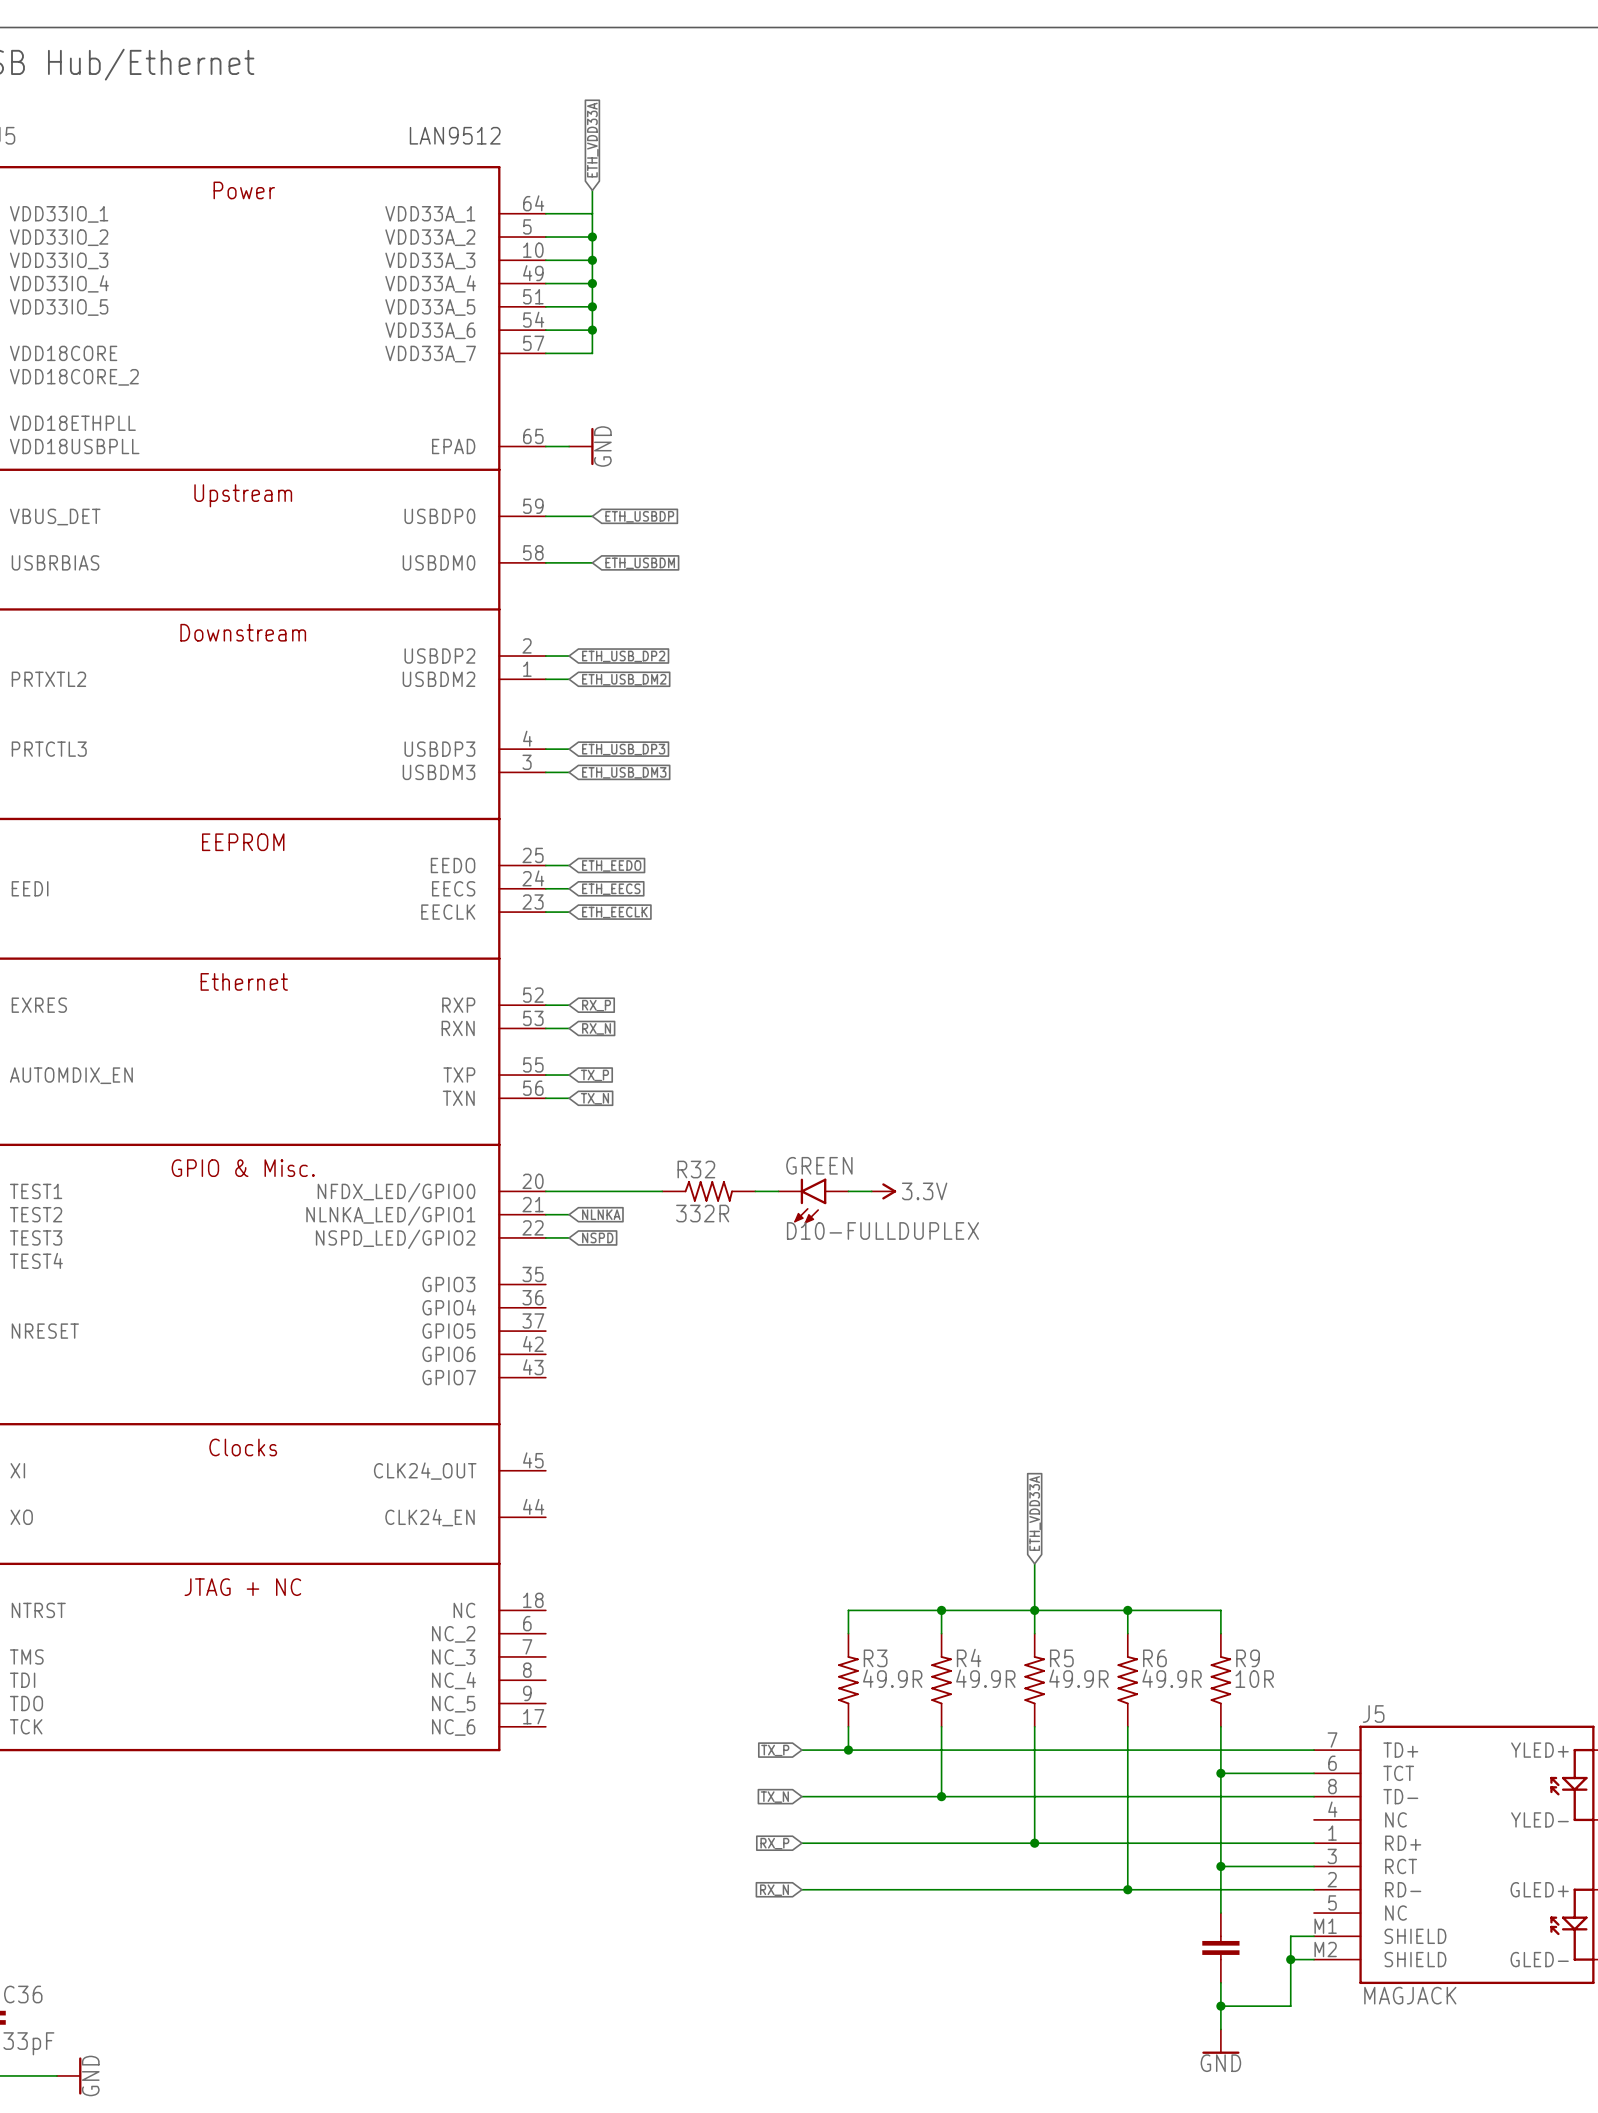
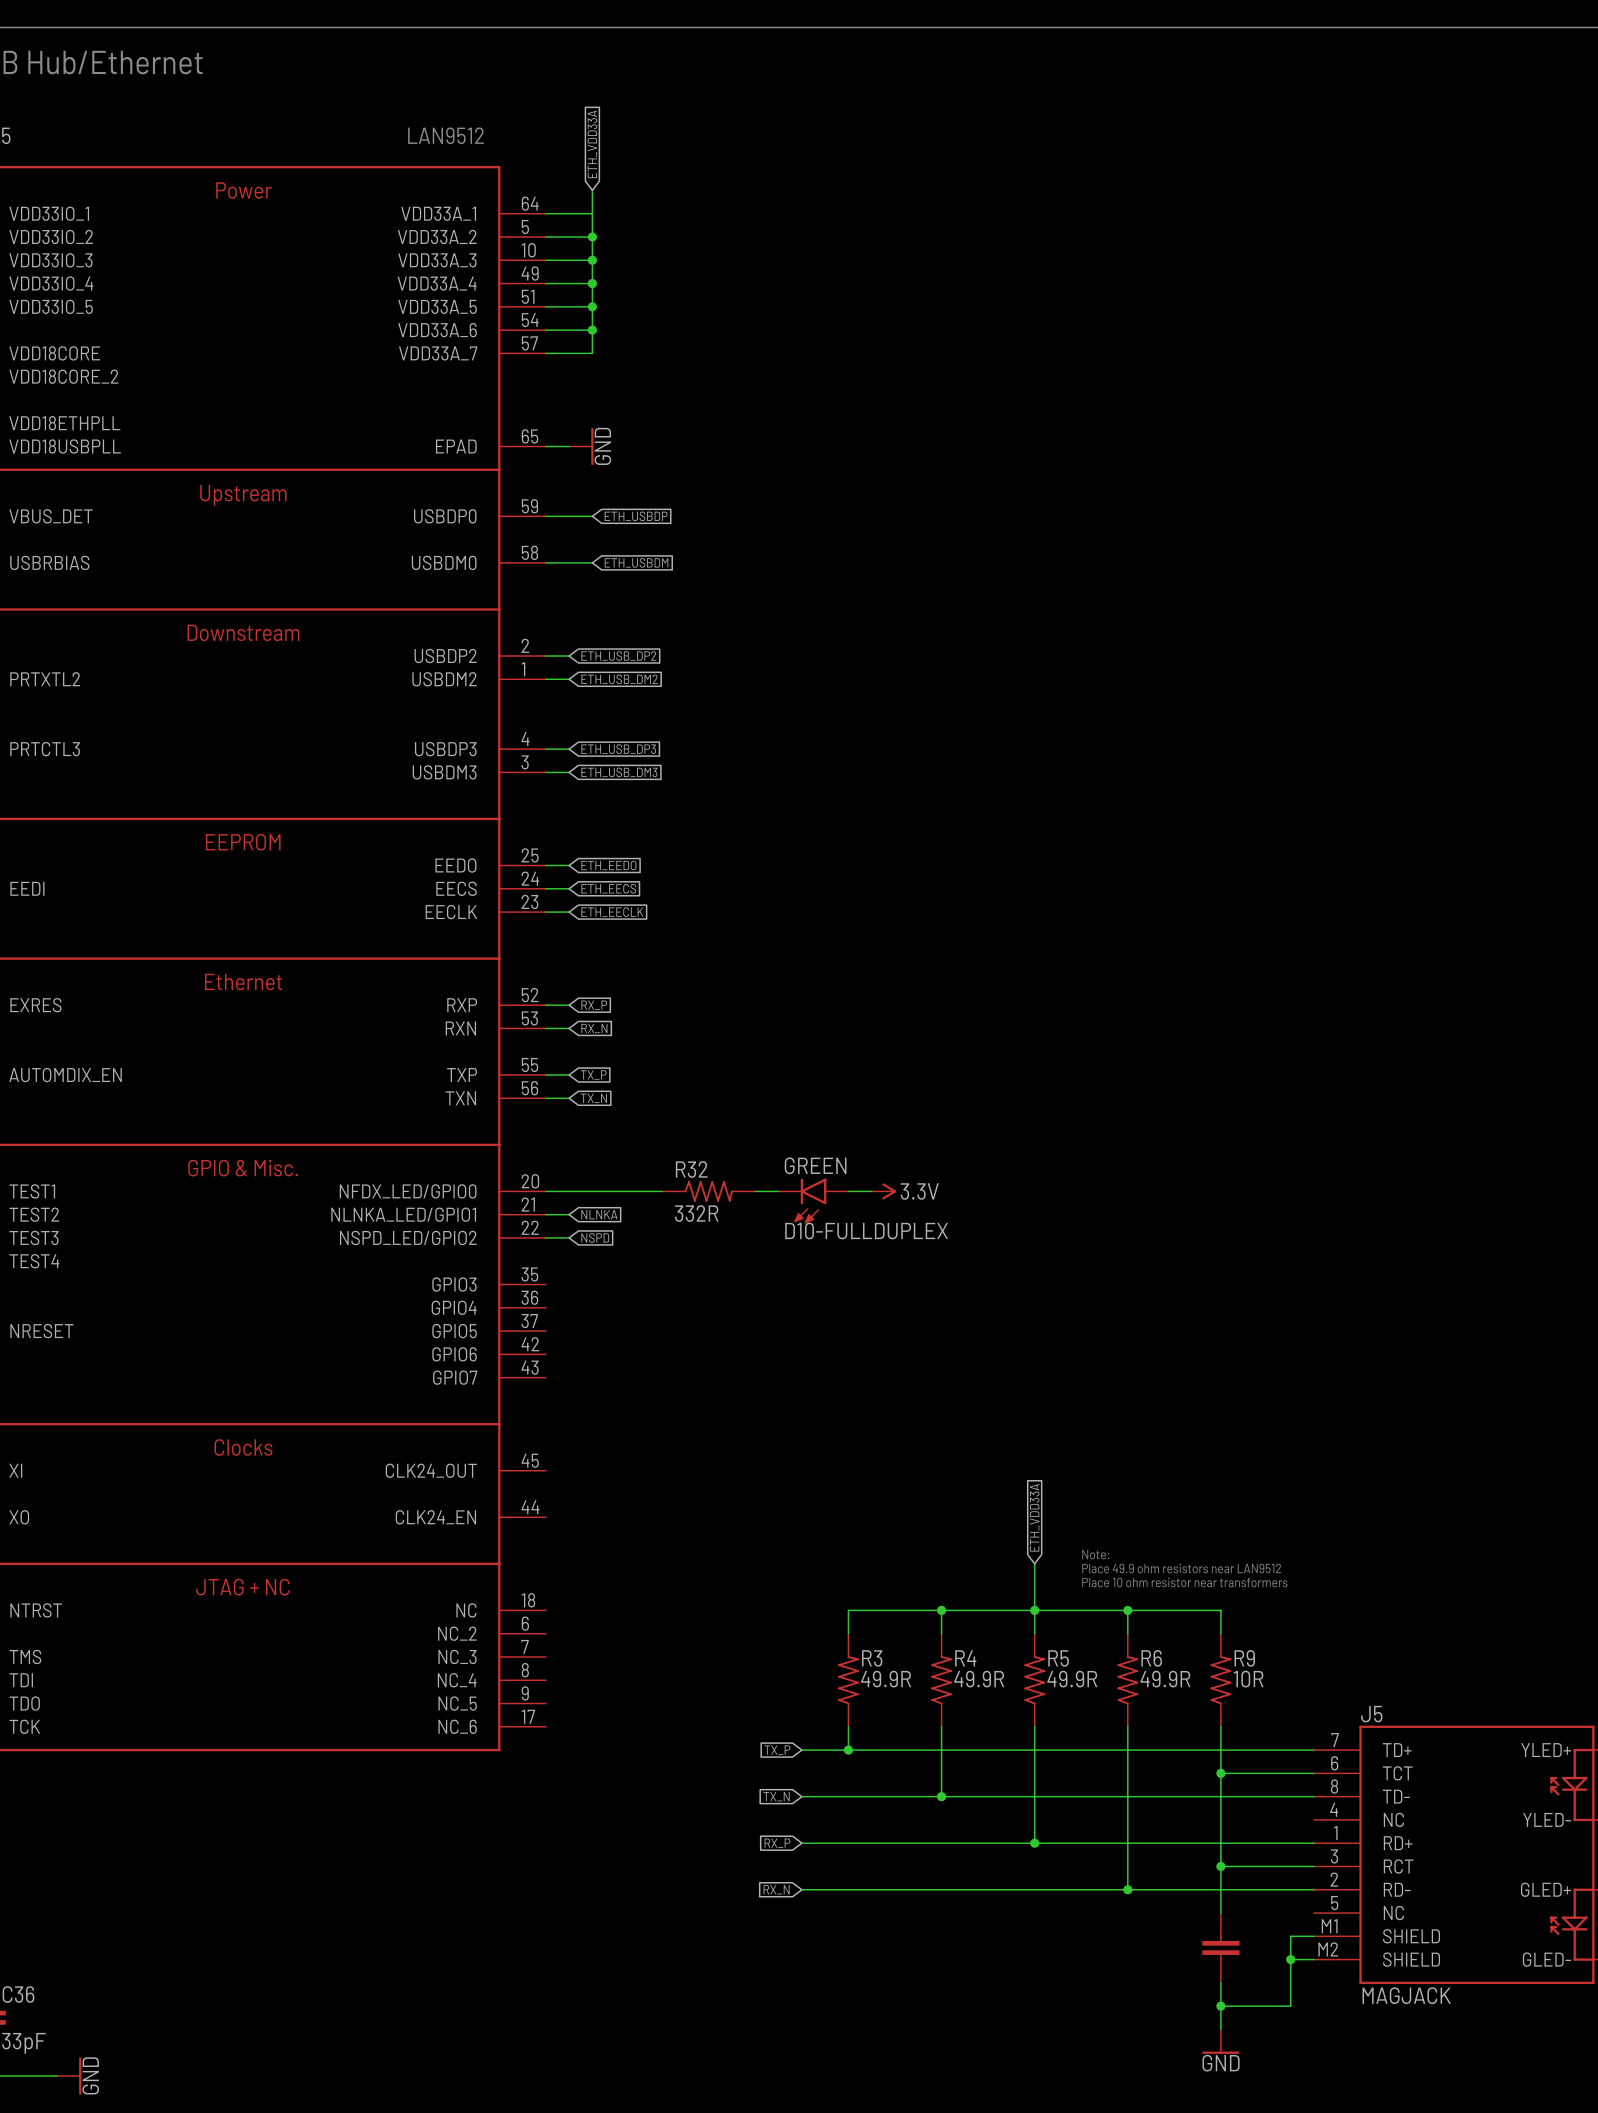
text: none -> Note: (1095, 1554)
text: none -> Place 49.9 ohm resistors near LAN9512 (1181, 1568)
text: none -> Place 10 ohm resistor near transformers (1184, 1582)

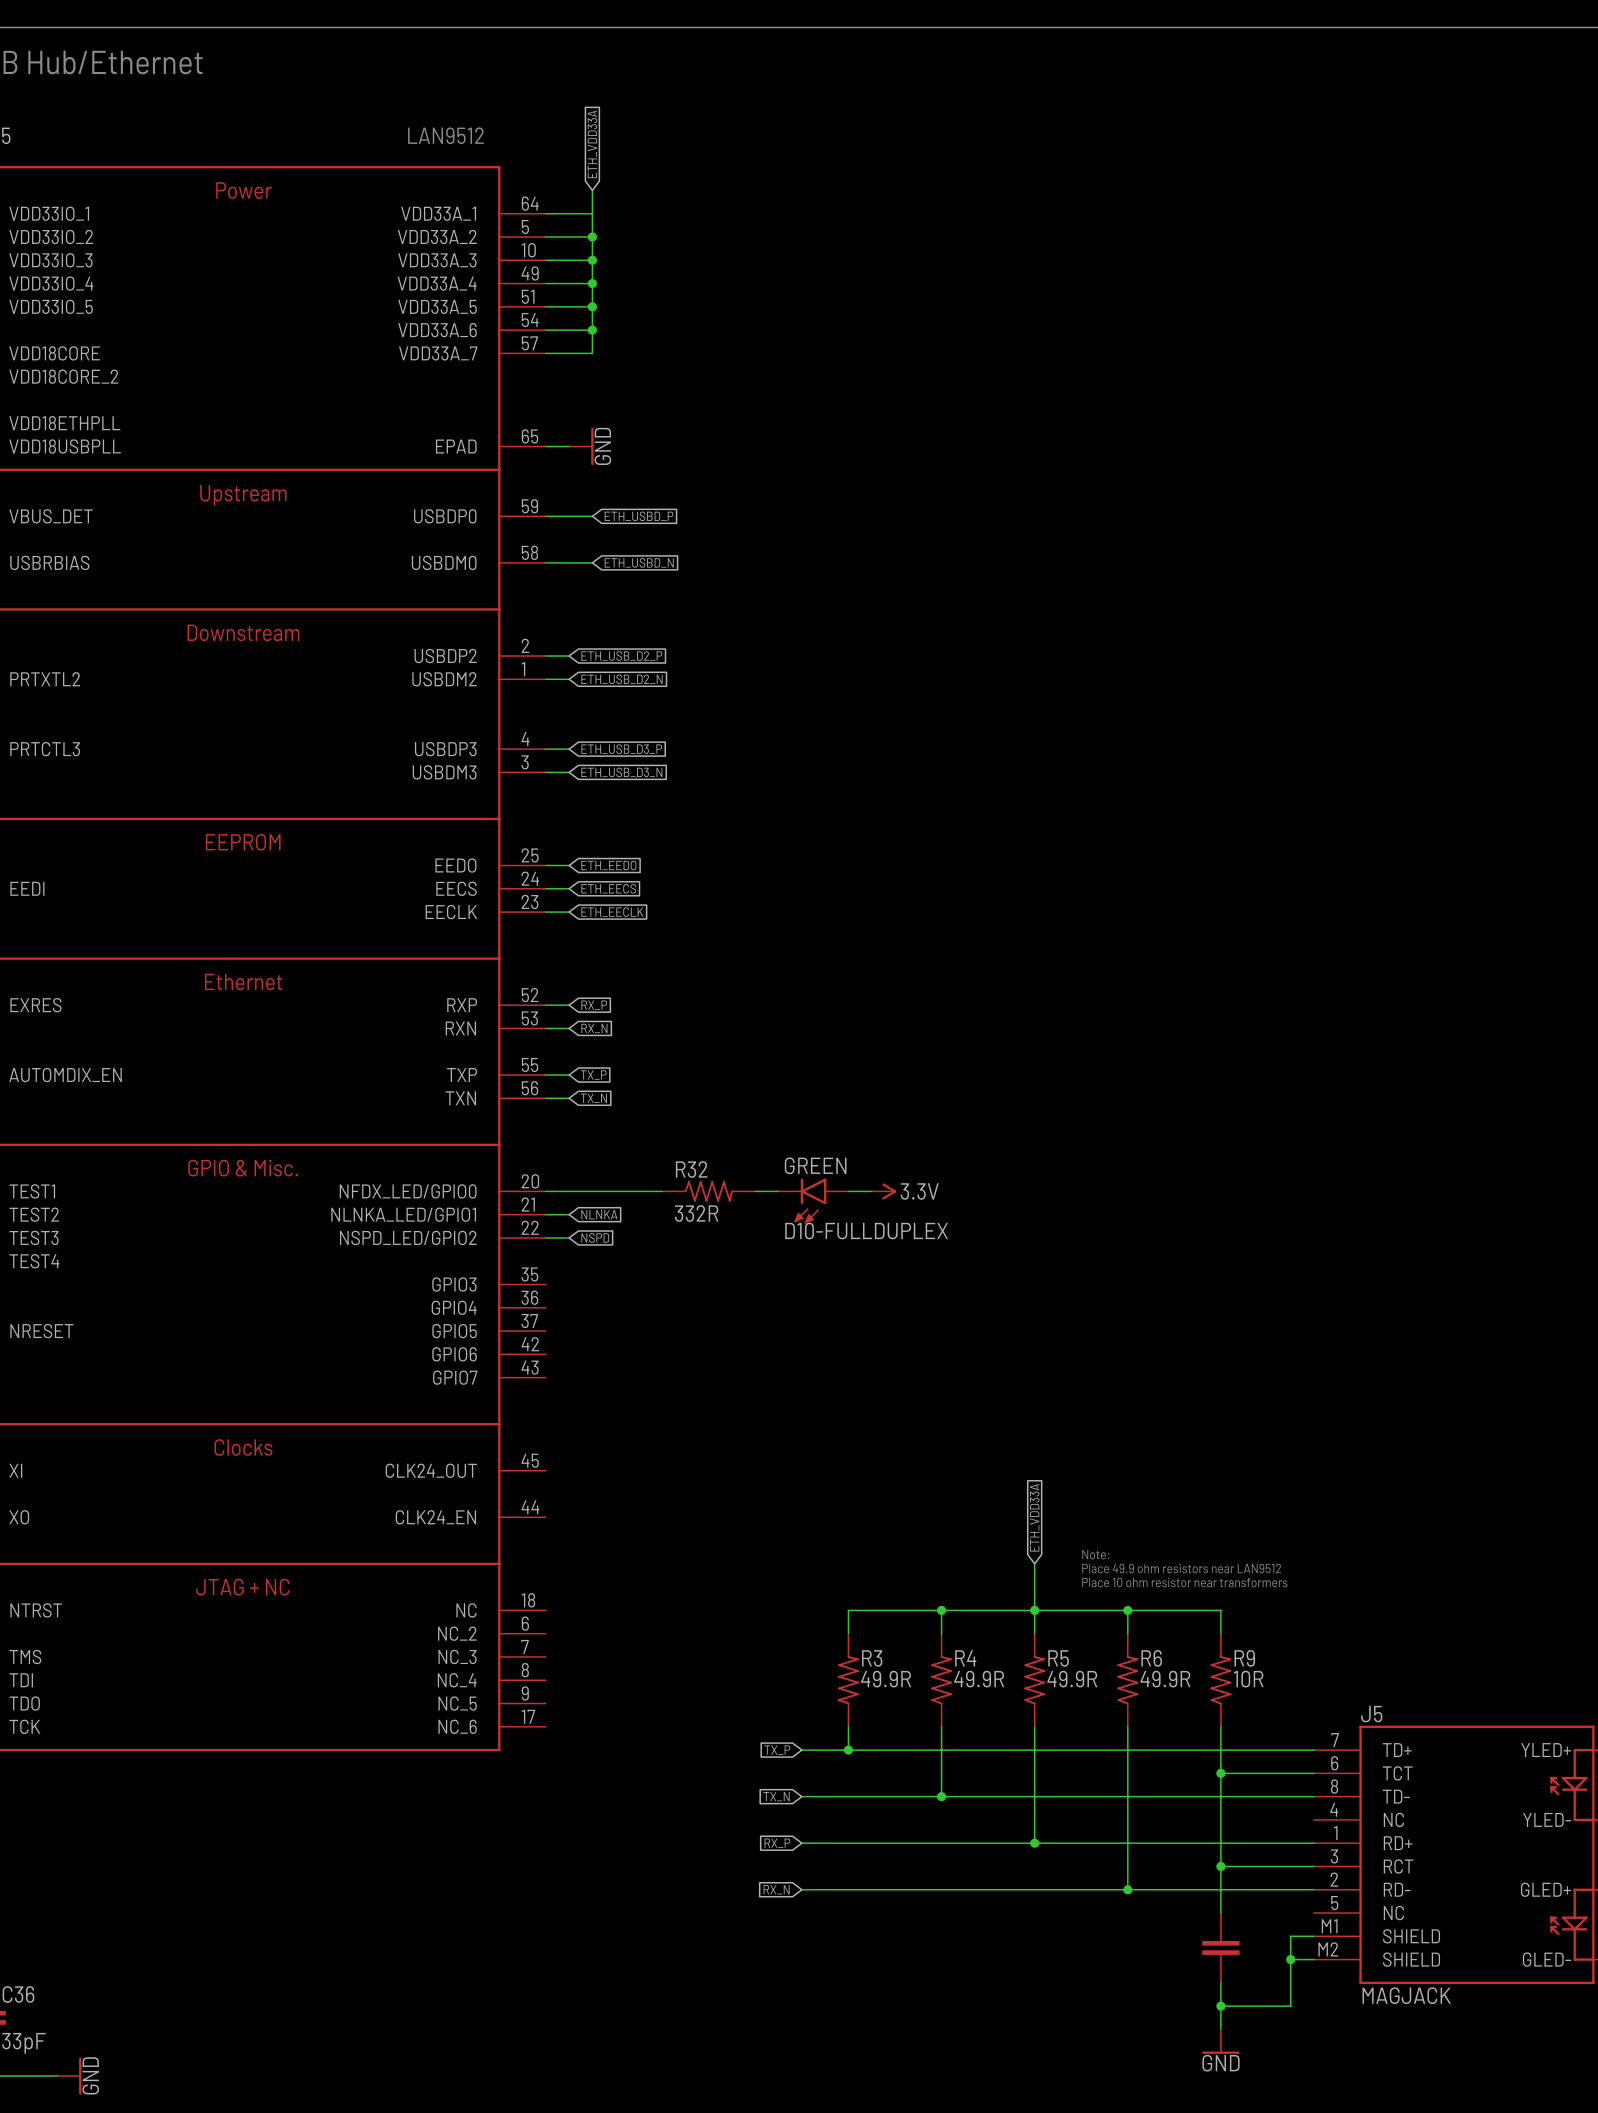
global label: ETH_USBDP (636, 516) -> ETH_USBD_P (639, 516)
global label: ETH_USBDM (636, 562) -> ETH_USBD_N (639, 562)
global label: ETH_USB_DP2 (618, 656) -> ETH_USB_D2_P (621, 656)
global label: ETH_USB_DM2 (619, 679) -> ETH_USB_D2_N (622, 679)
global label: ETH_USB_DP3 (618, 749) -> ETH_USB_D3_P (621, 749)
global label: ETH_USB_DM3 (619, 772) -> ETH_USB_D3_N (621, 772)

